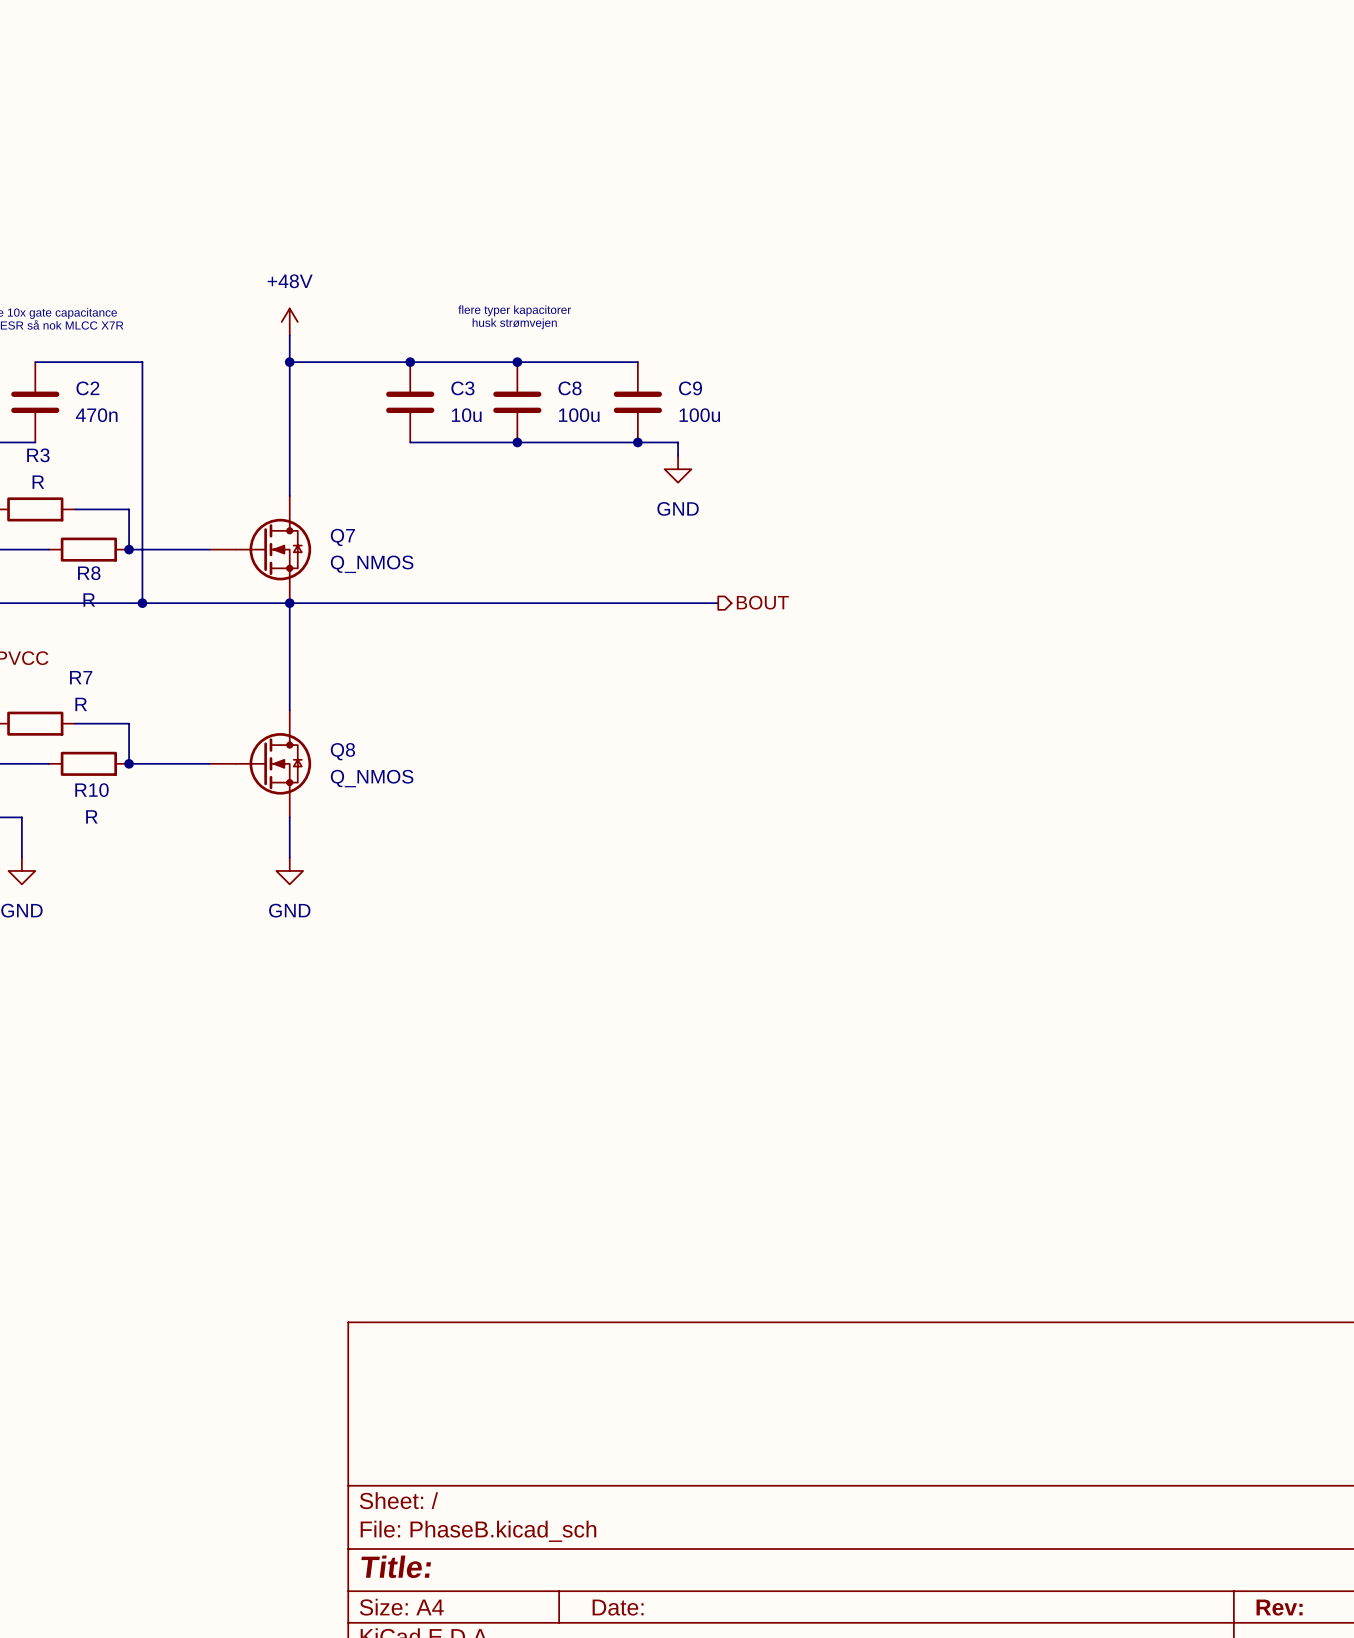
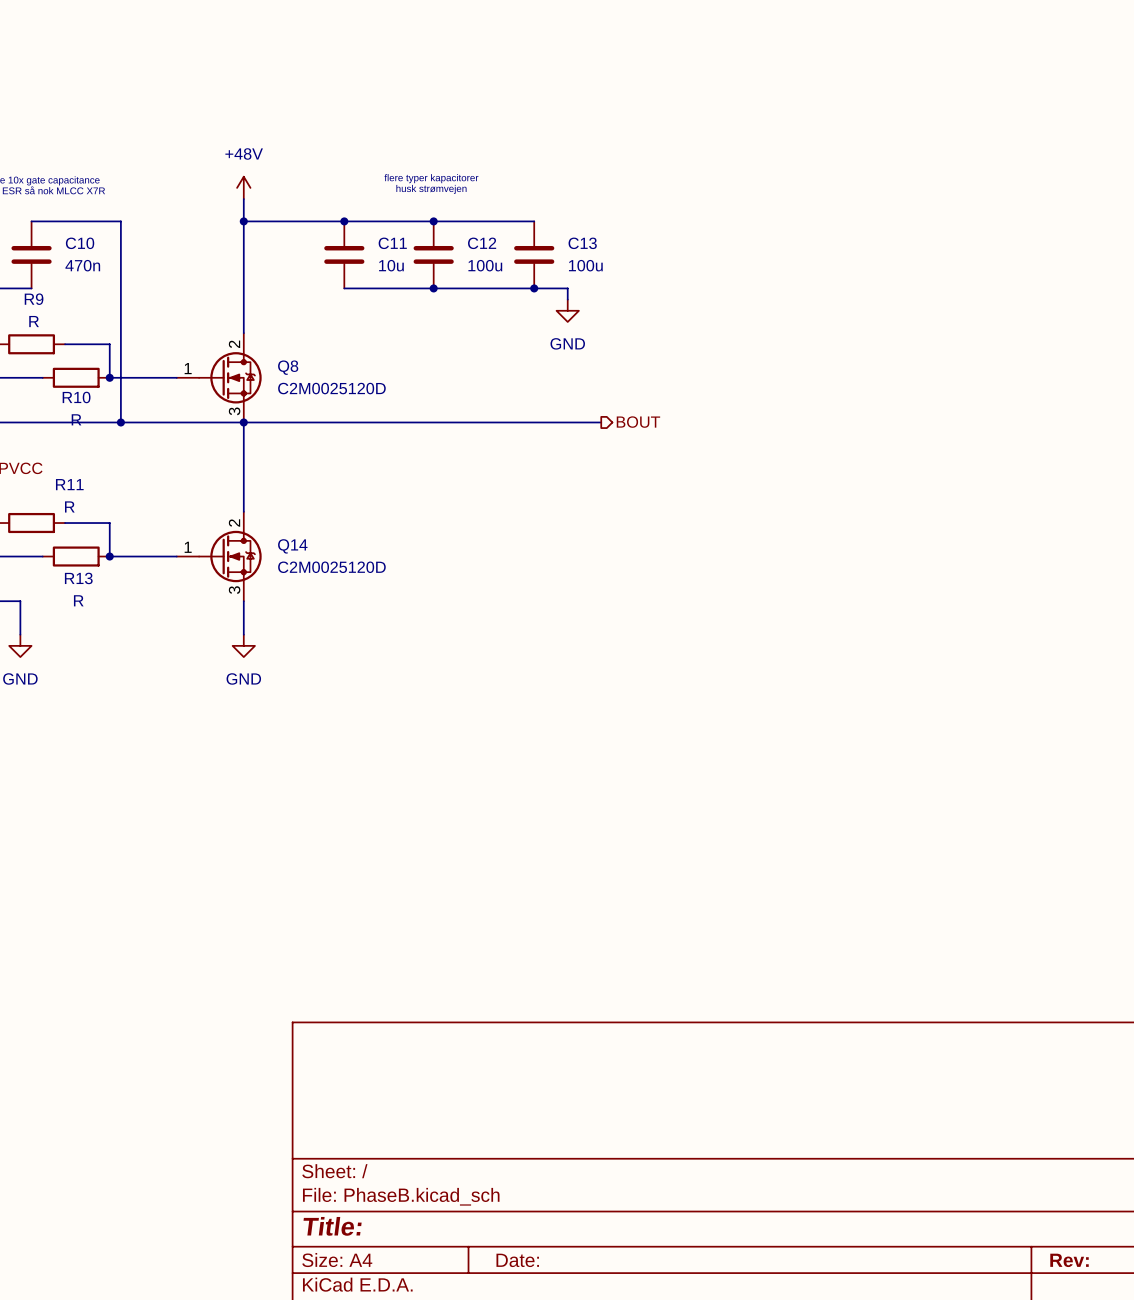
C2 name: C2 (87, 388) -> C10 (80, 243)
C3 name: C3 (462, 388) -> C11 (392, 243)
C8 name: C8 (570, 388) -> C12 (482, 243)
C9 name: C9 (690, 388) -> C13 (582, 243)
R3 name: R3 (38, 455) -> R9 (34, 299)
Q7: Q_NMOS (260, 549) -> none
R8 name: R8 (89, 573) -> R10 (76, 397)
R7 name: R7 (81, 677) -> R11 (69, 484)
Q8 symbol: [209, 710, 312, 818] -> [176, 333, 262, 423]
Q14: none -> C2M0025120D (219, 556)
Q8 value: Q_NMOS (372, 778) -> C2M0025120D (331, 388)
R10 name: R10 (91, 790) -> R13 (78, 578)

